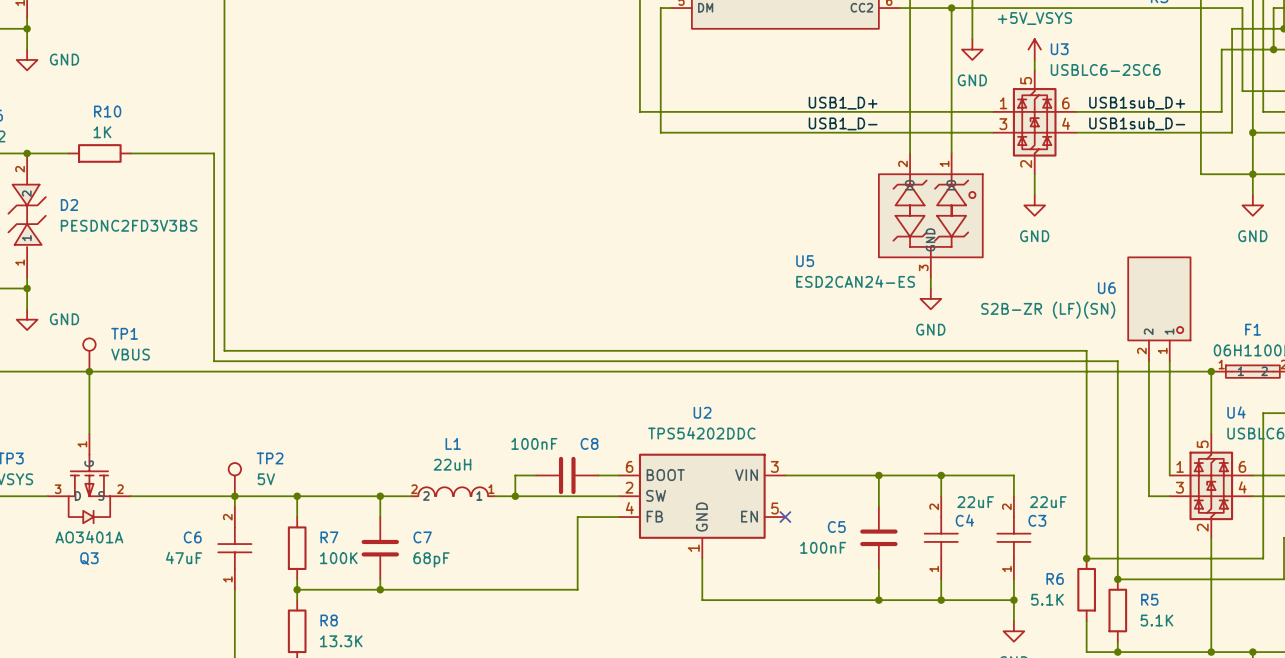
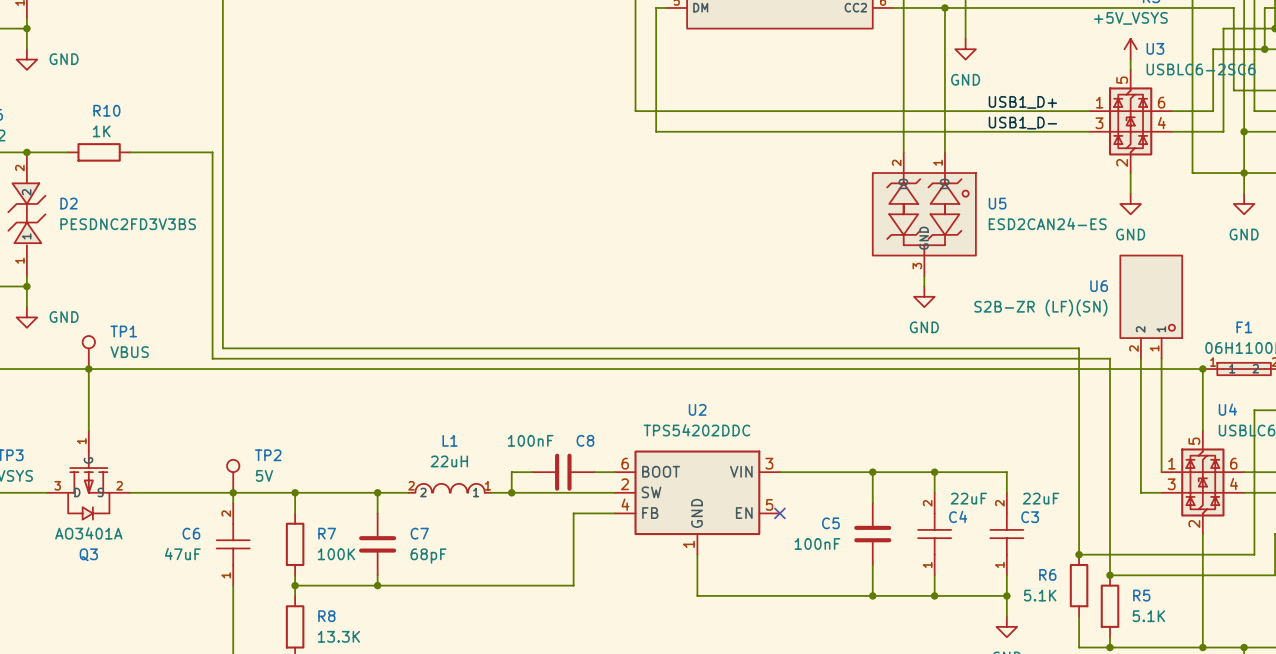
power symbol position: +5V_VSYS (1034, 49) -> +5V_VSYS (1130, 49)
wire: (1034, 59) (1034, 70) -> (1130, 59) (1130, 69)
label position: USB1_D+ (843, 103) -> USB1_D+ (1022, 102)
label: USB1sub_D+ (1137, 103) -> none
U3 position: (1034, 122) -> (1130, 121)
label position: USB1_D- (843, 123) -> USB1_D- (1022, 123)
label: USB1sub_D- (1137, 123) -> none
wire: (1034, 174) (1034, 195) -> (1130, 173) (1130, 193)
power symbol position: GND (1034, 205) -> GND (1130, 203)
U5 name position: U5 (805, 261) -> U5 (997, 203)
U5 value position: ESD2CAN24-ES (855, 281) -> ESD2CAN24-ES (1047, 223)

